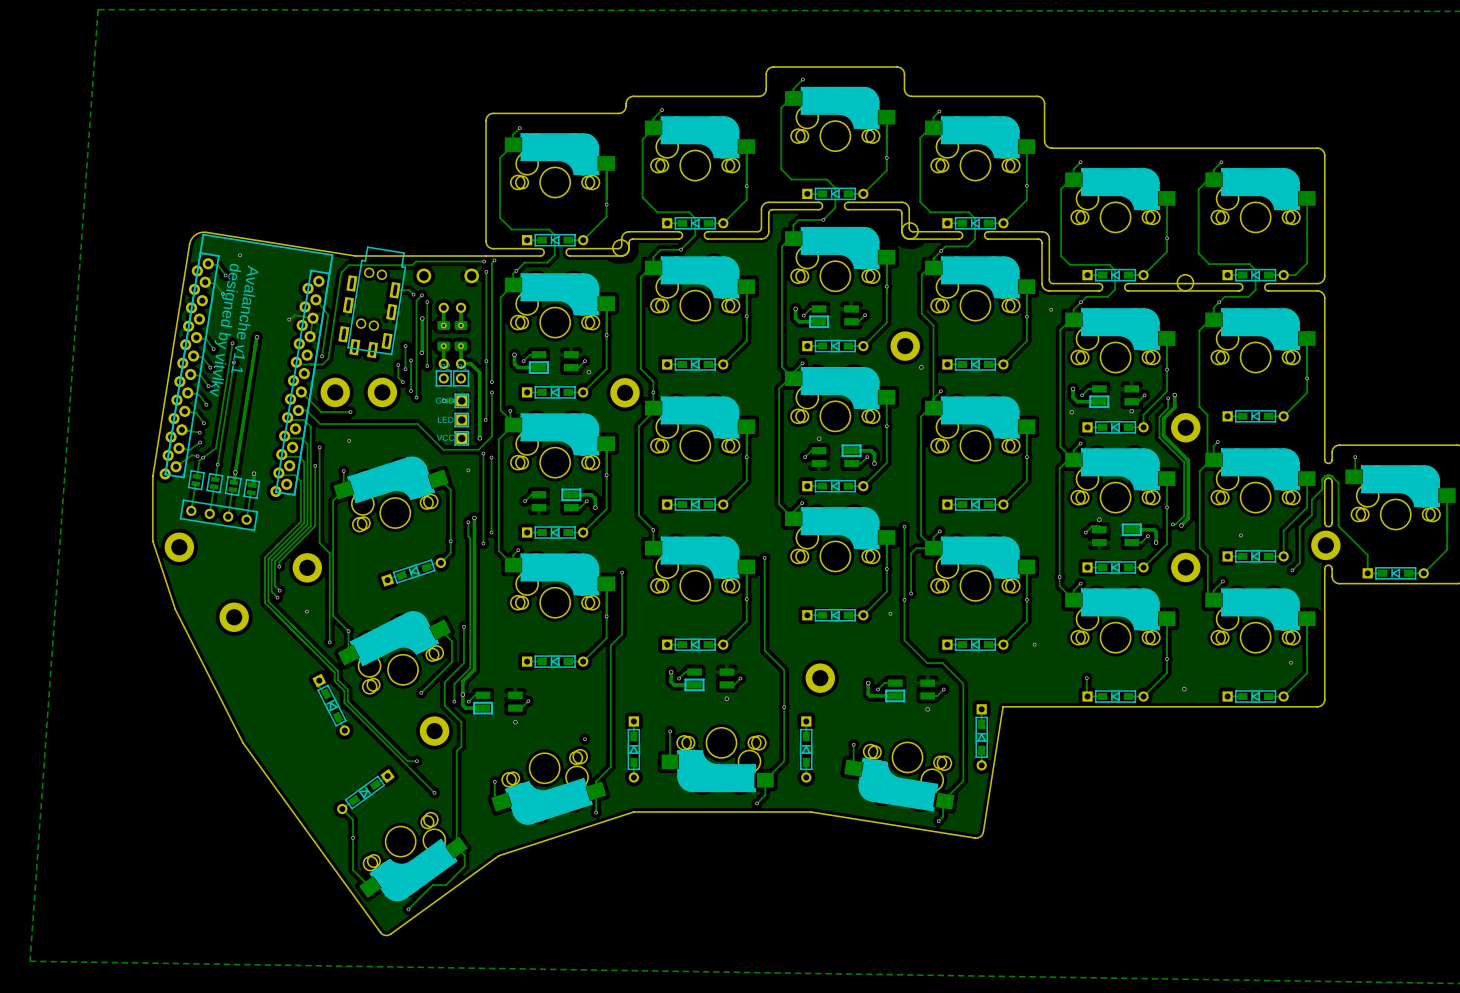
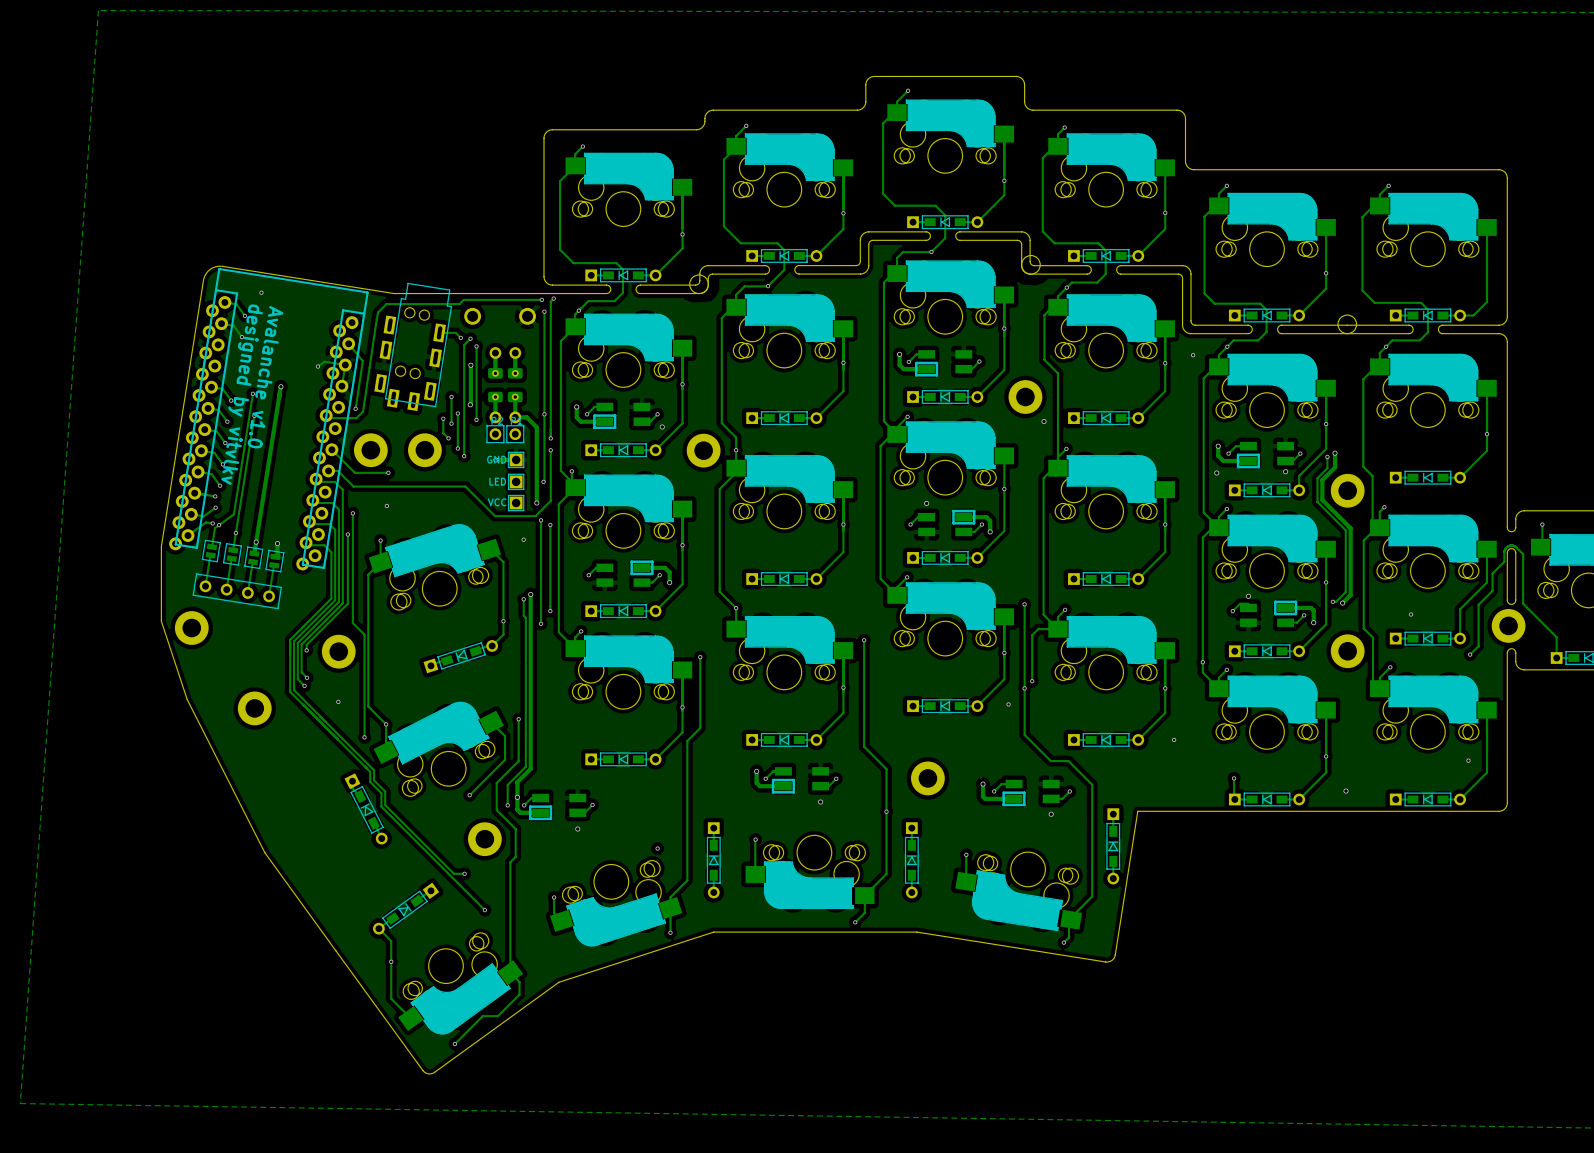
text: Avalanche v1.1 (244, 319) -> Avalanche v1.0 (265, 377)

